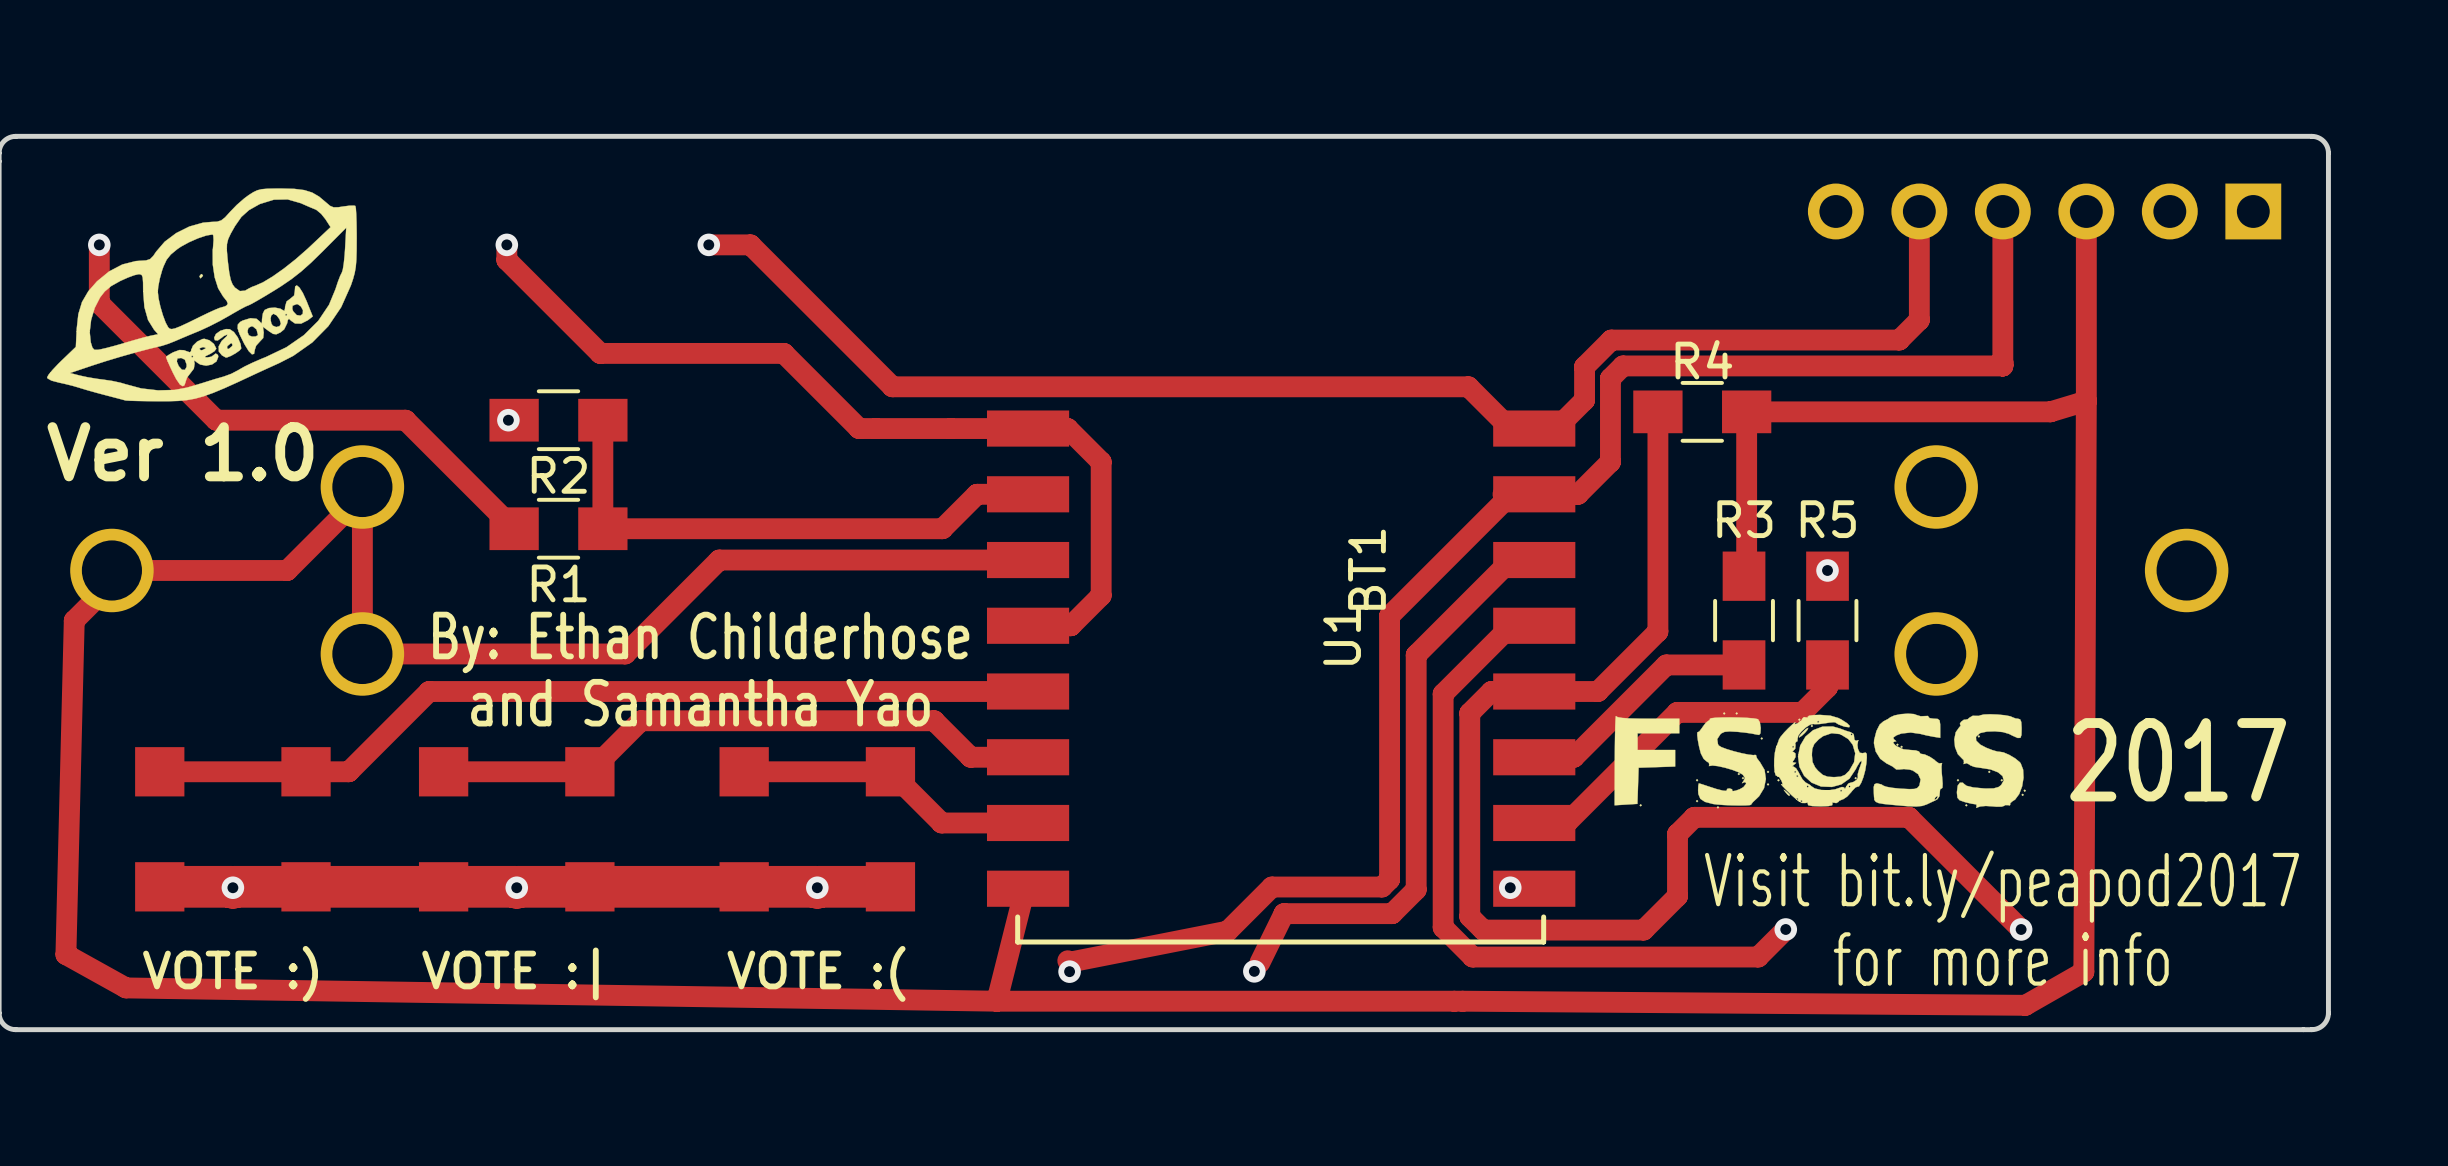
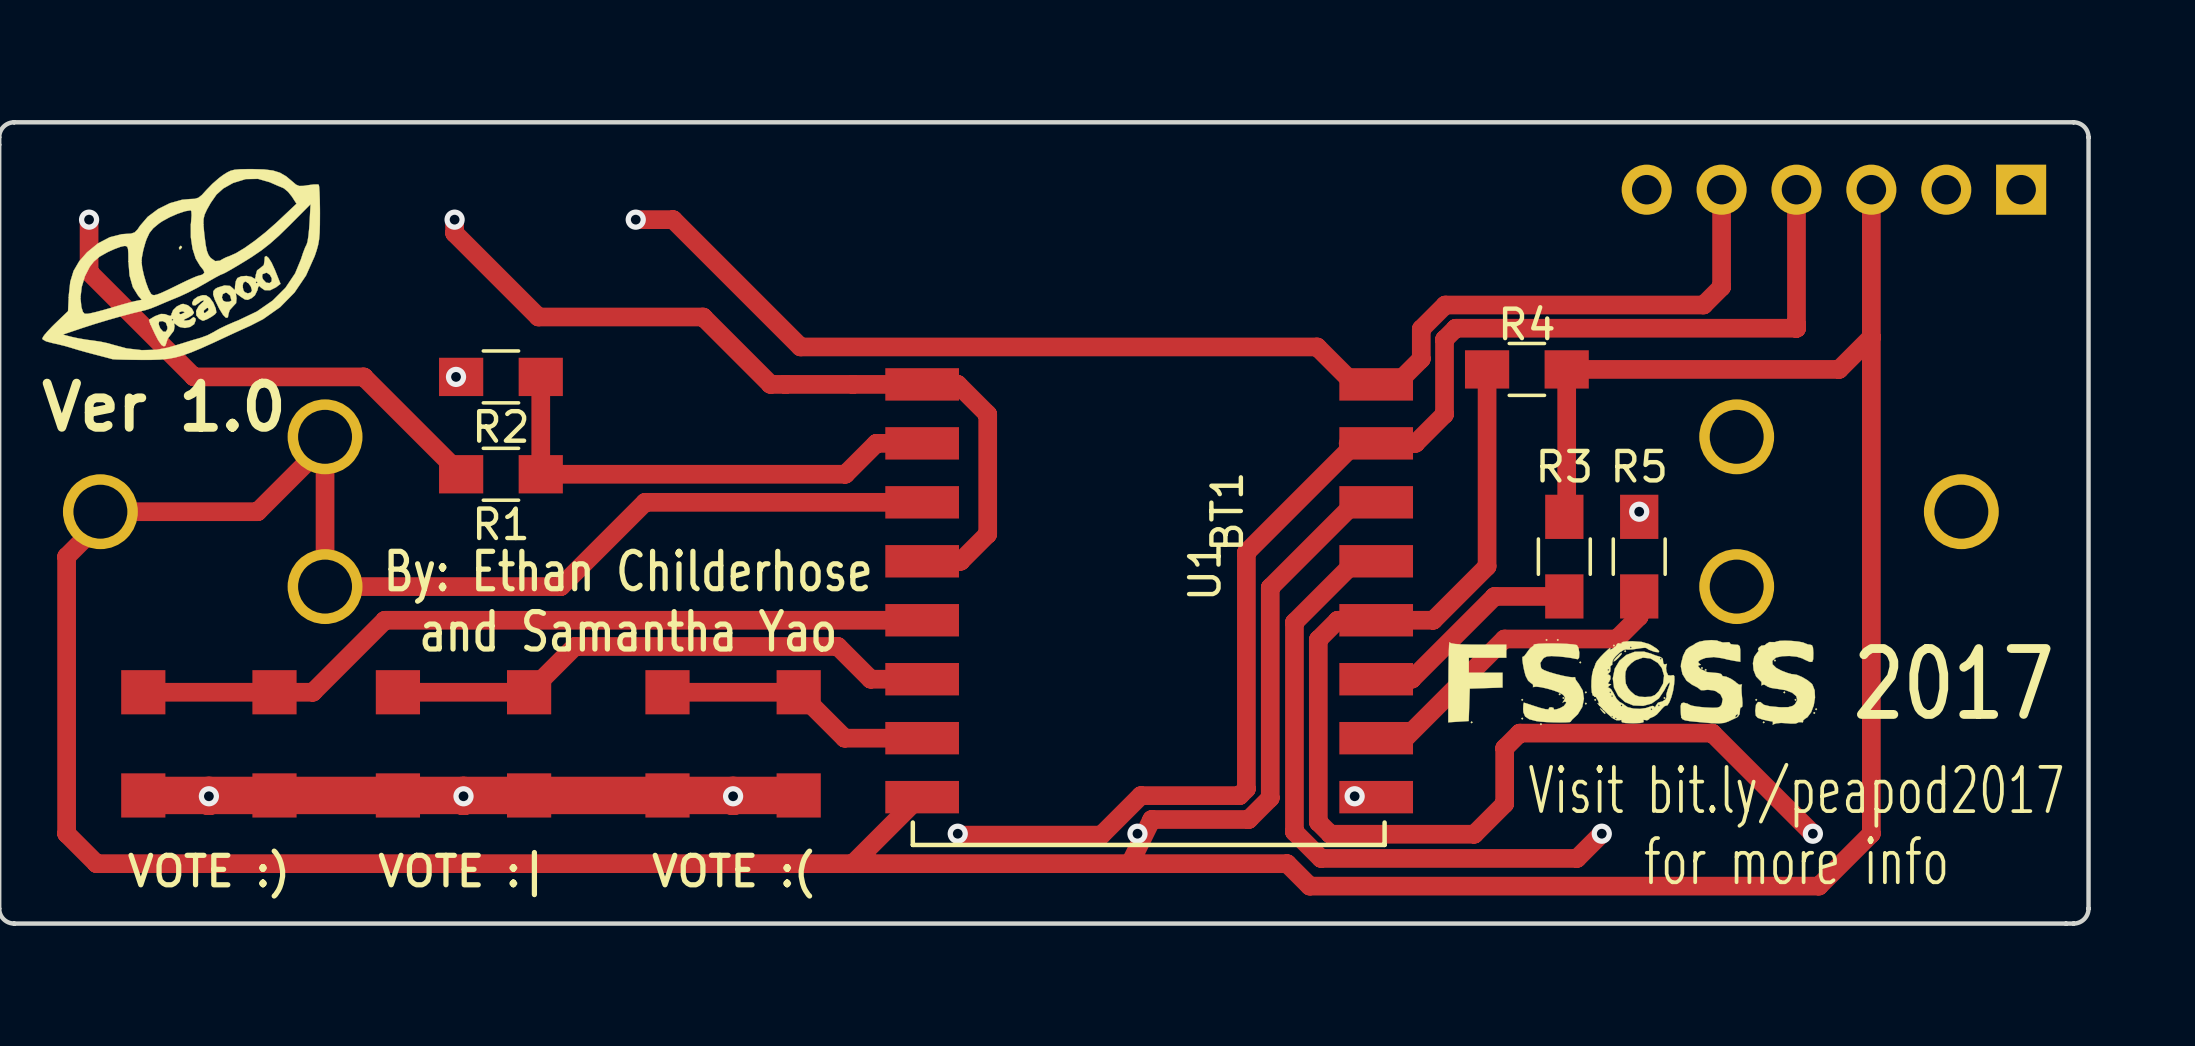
track: (2050, 411) (2086, 401) (2083, 971) (2025, 1005) (1462, 1001) (996, 1001) -> (1839, 369) (1871, 337)
track: (74, 620) (65, 954) (125, 987) (996, 1001) -> (66, 556) (66, 833) (96, 863) (1287, 863) (1309, 886) (1818, 886) (1871, 833) (1871, 359)
track: (1025, 888) (996, 1001) -> (919, 797) (852, 863)
track: (1227, 931) (1069, 962) (1067, 960) -> (1101, 835) (957, 833)
via position: (1069, 971) -> (957, 833)
via position: (1254, 971) -> (1137, 833)

